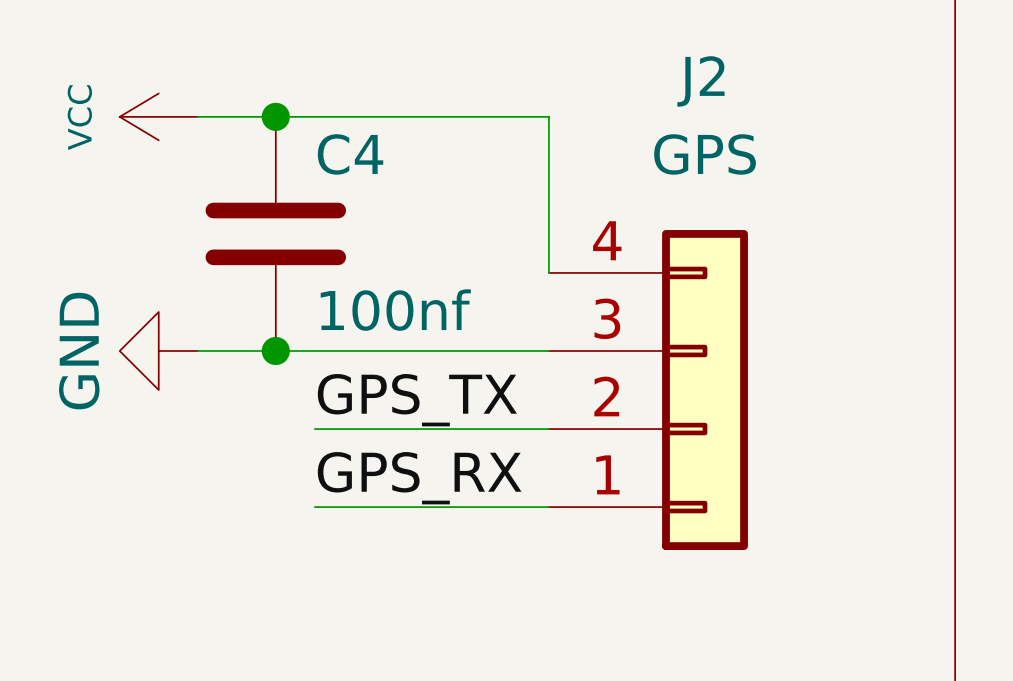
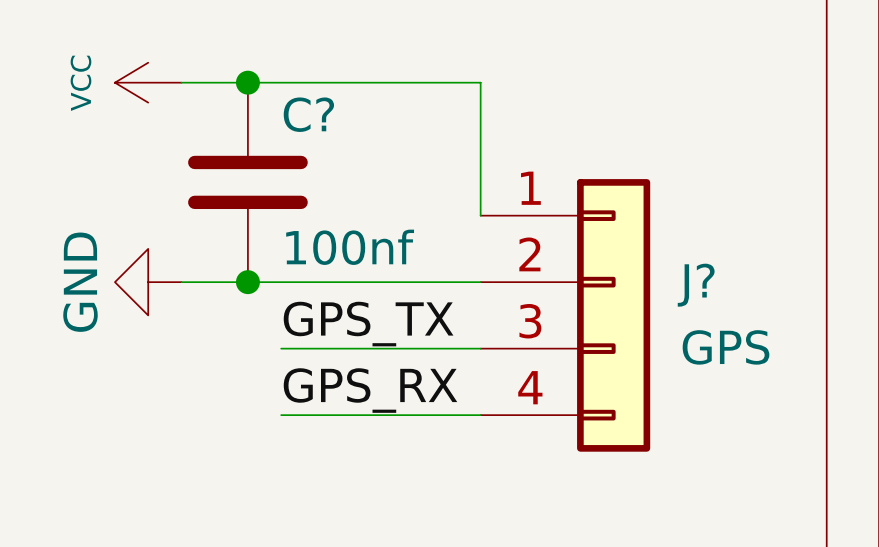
J2 name: J2 (700, 81) -> J? (696, 285)
C4 name: C4 (350, 154) -> C? (308, 114)
J2 value position: GPS (705, 154) -> GPS (726, 347)
J2 flip: as is (705, 390) -> up-down (613, 315)

